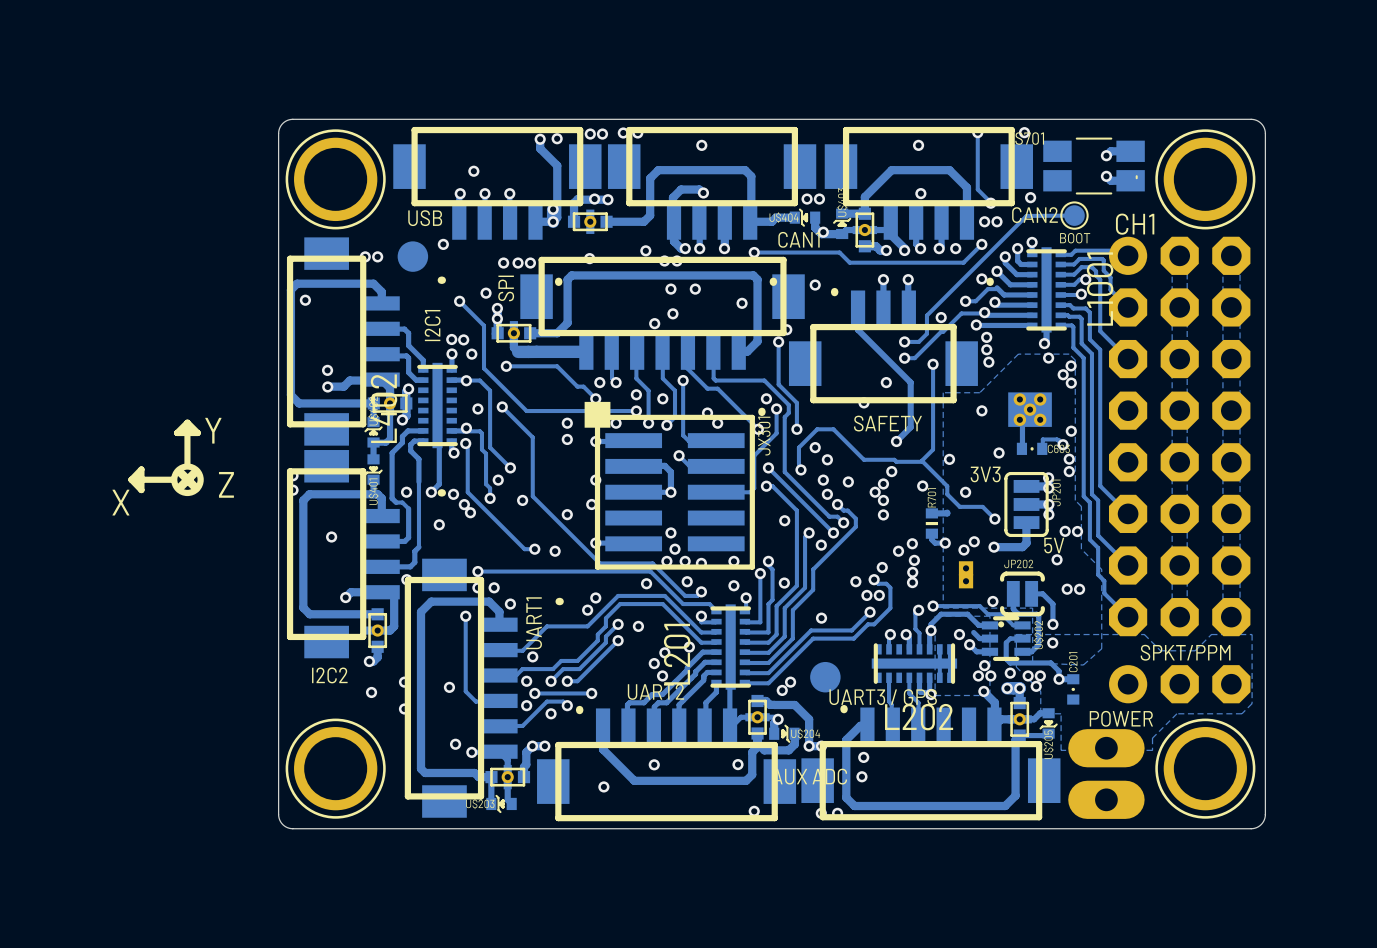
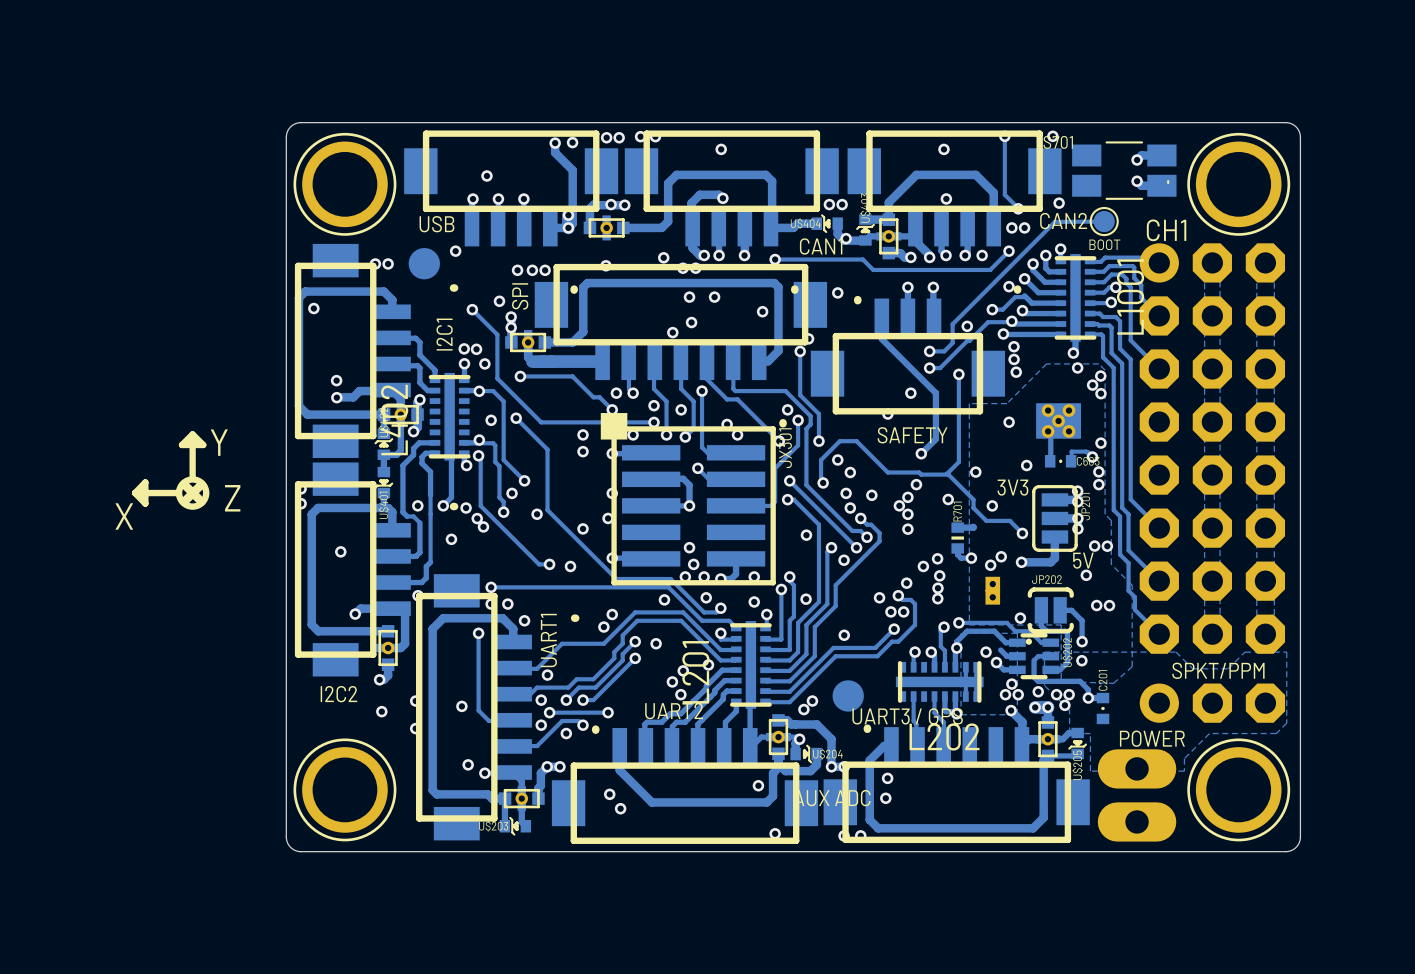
track: none -> (736, 558) (736, 574) (731, 579) (720, 579)
via position: (654, 764) -> (609, 794)

